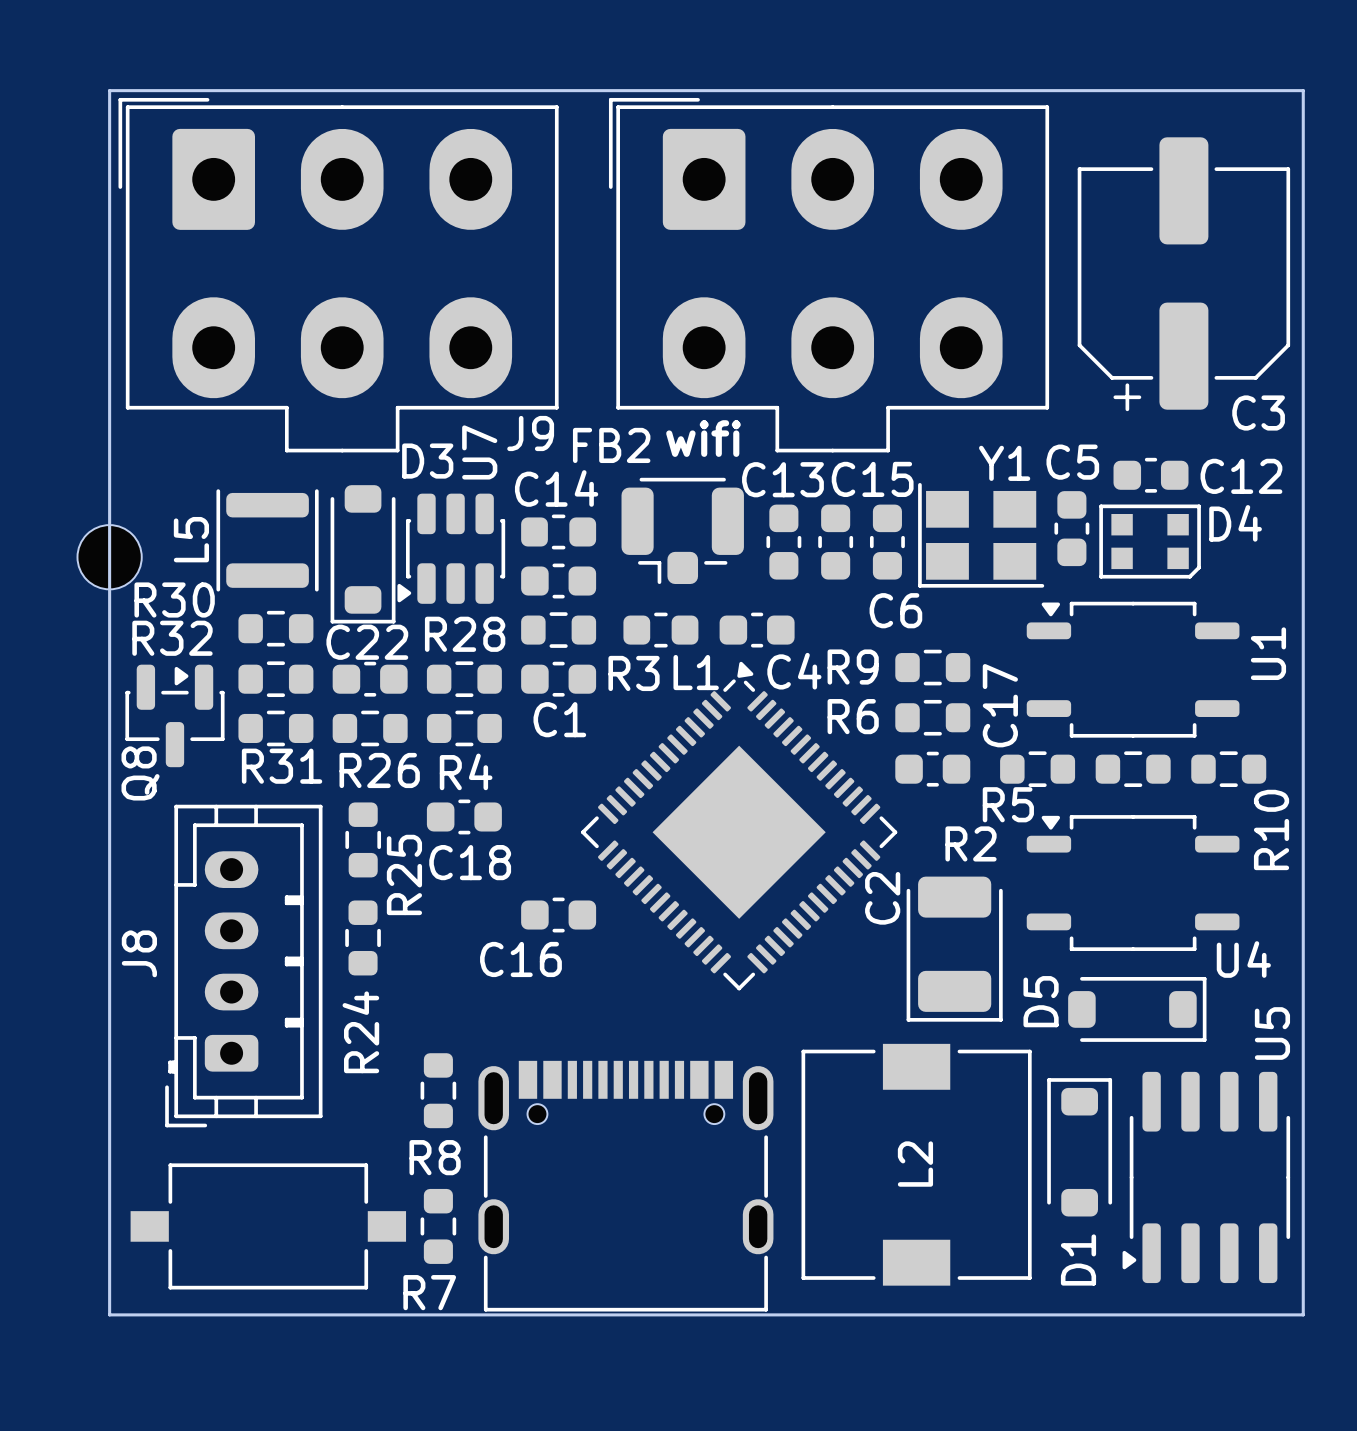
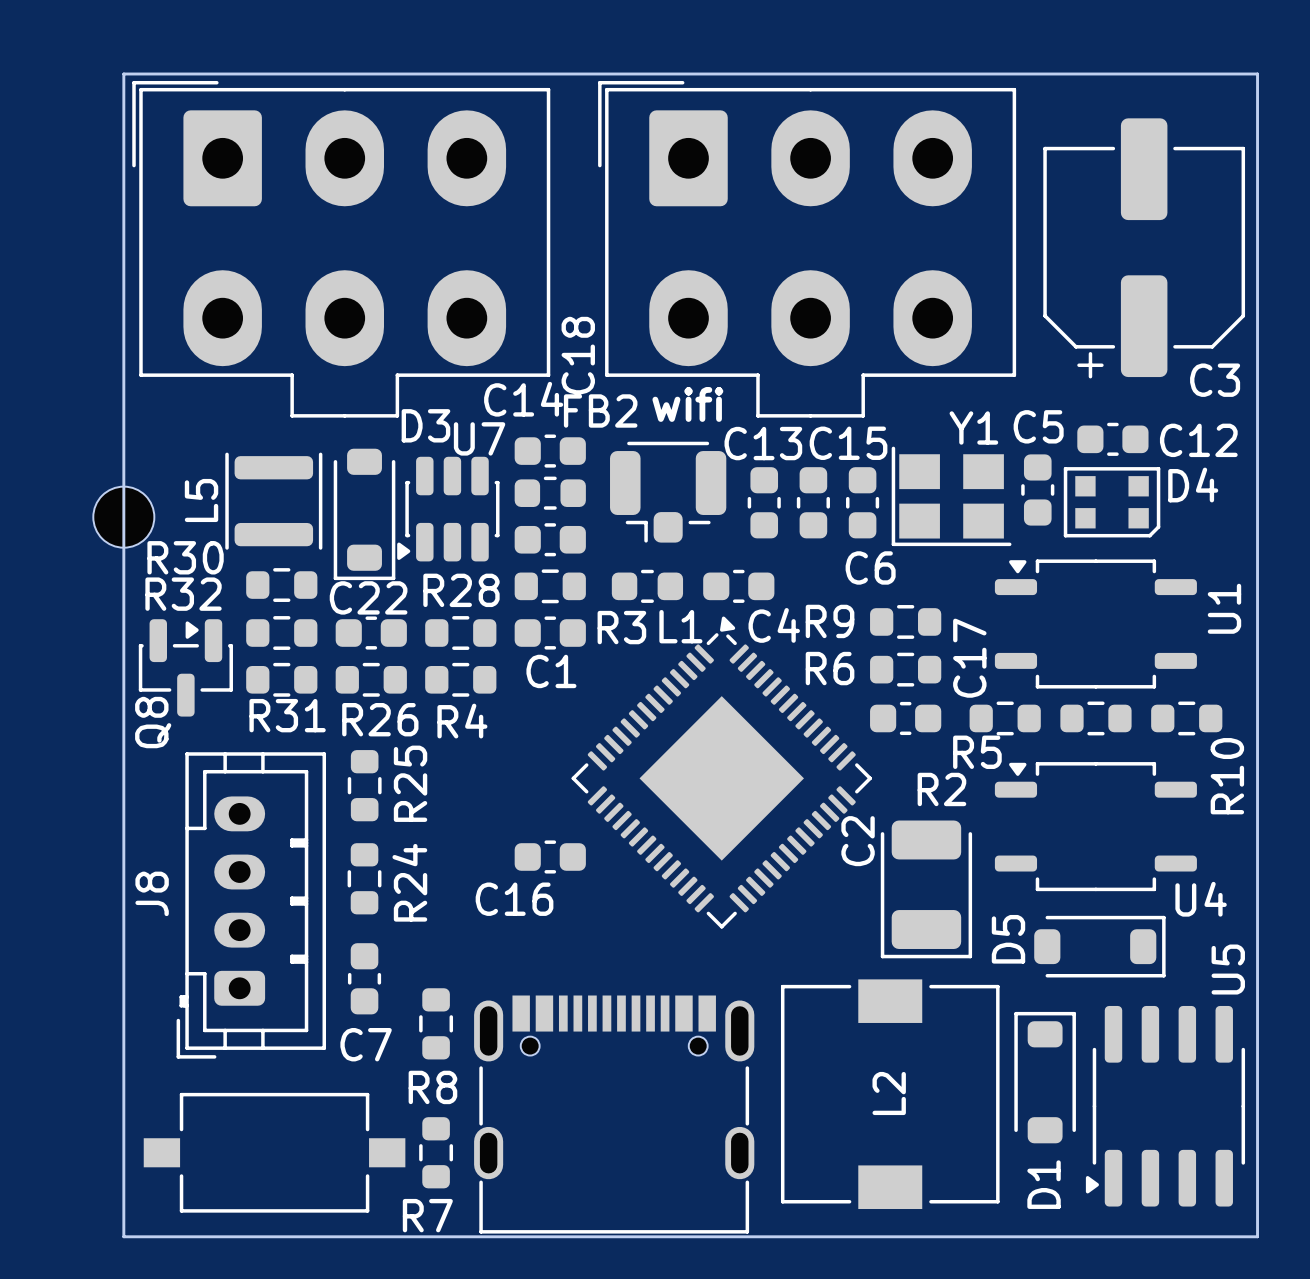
J9 name: J9 (530, 433) -> none
U7 name rotation: 0° (479, 452) -> 90° clockwise (479, 438)
C14 name position: C14 (556, 488) -> C14 (523, 399)
C18 position: (464, 816) -> (550, 451)
C18 name rotation: 0° (470, 862) -> 90° counterclockwise (578, 355)
C18 name position: C18 (470, 862) -> C18 (578, 355)
R25 name position: R25 (404, 874) -> R25 (410, 783)
R24 name position: R24 (360, 1032) -> R24 (409, 882)
C7: none -> (364, 978)

